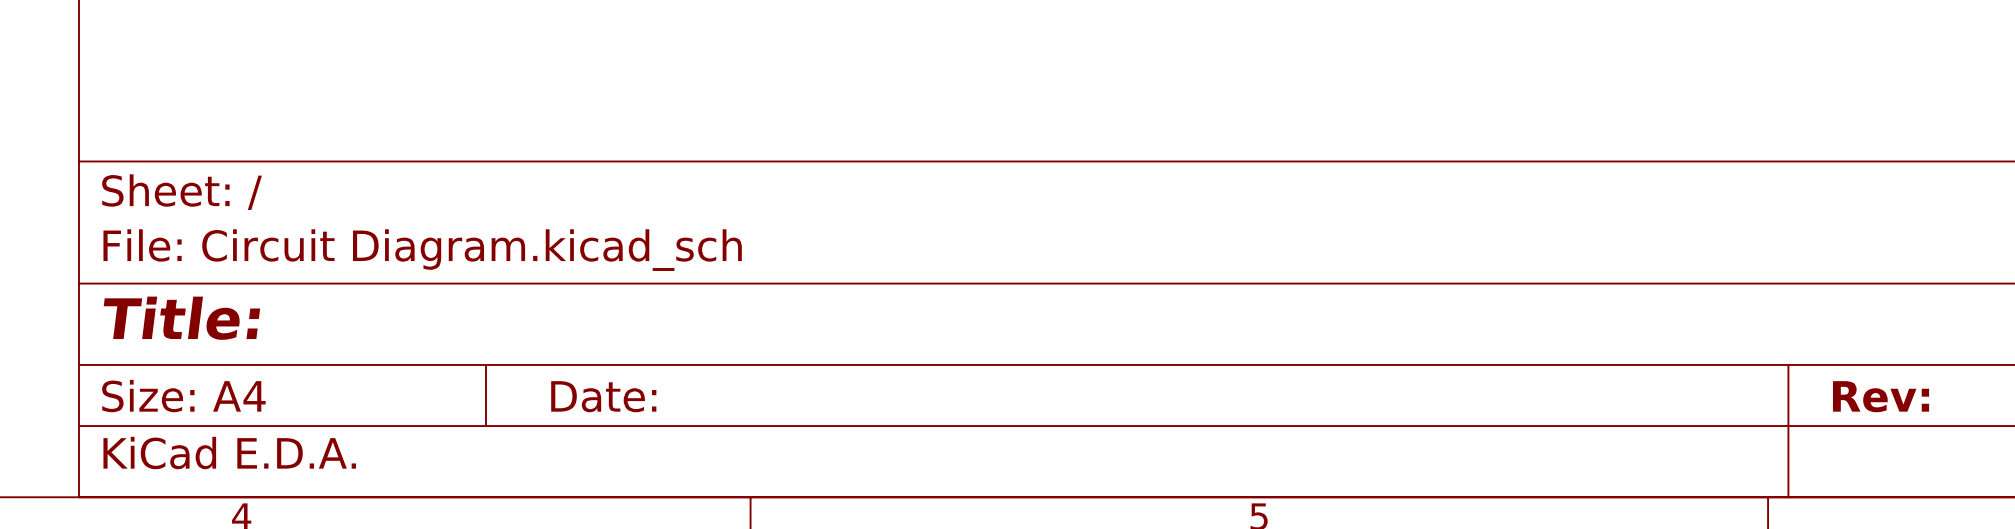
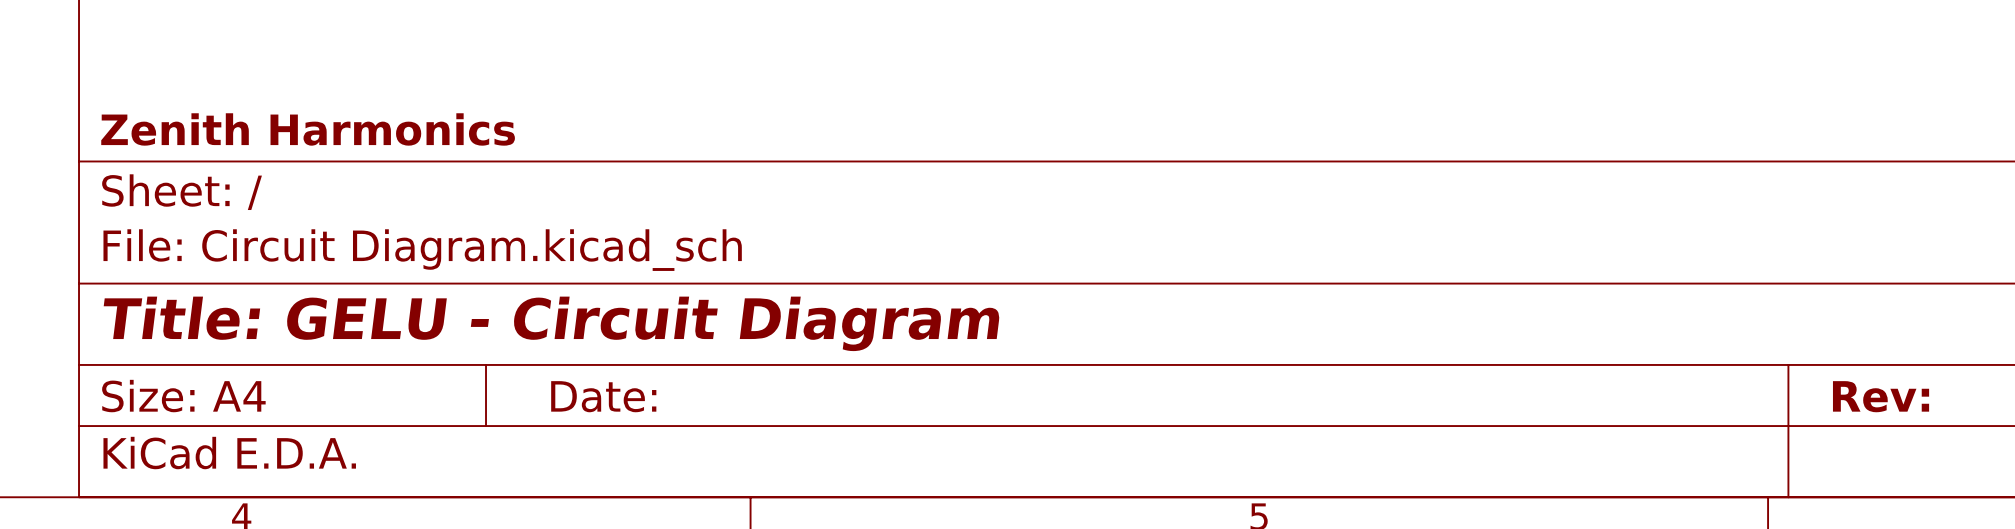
title block: none -> Zenith Harmonics (308, 129)
title block: Title: (181, 318) -> Title: GELU - Circuit Diagram (551, 323)

